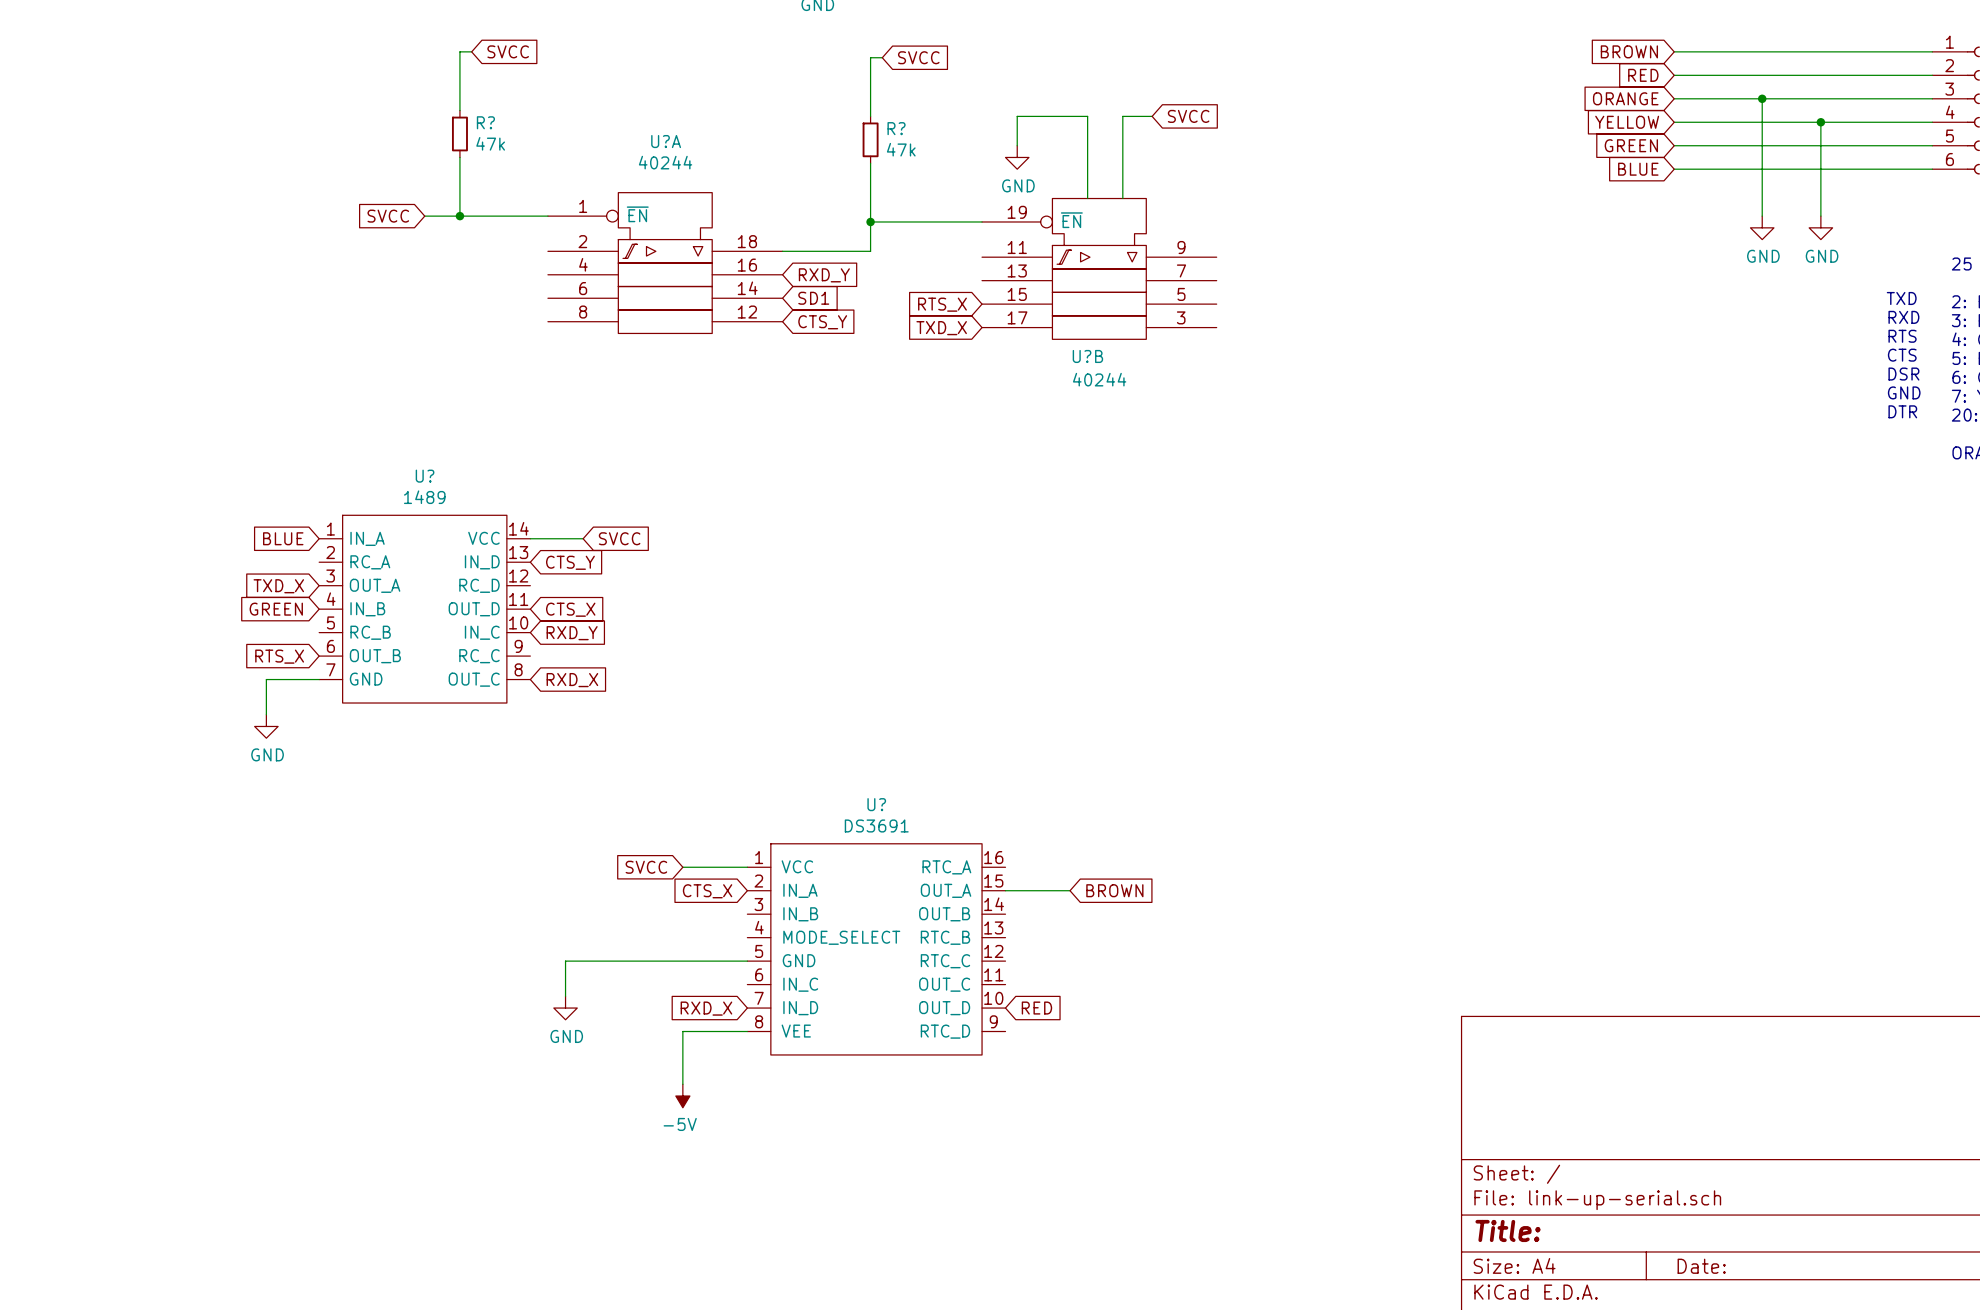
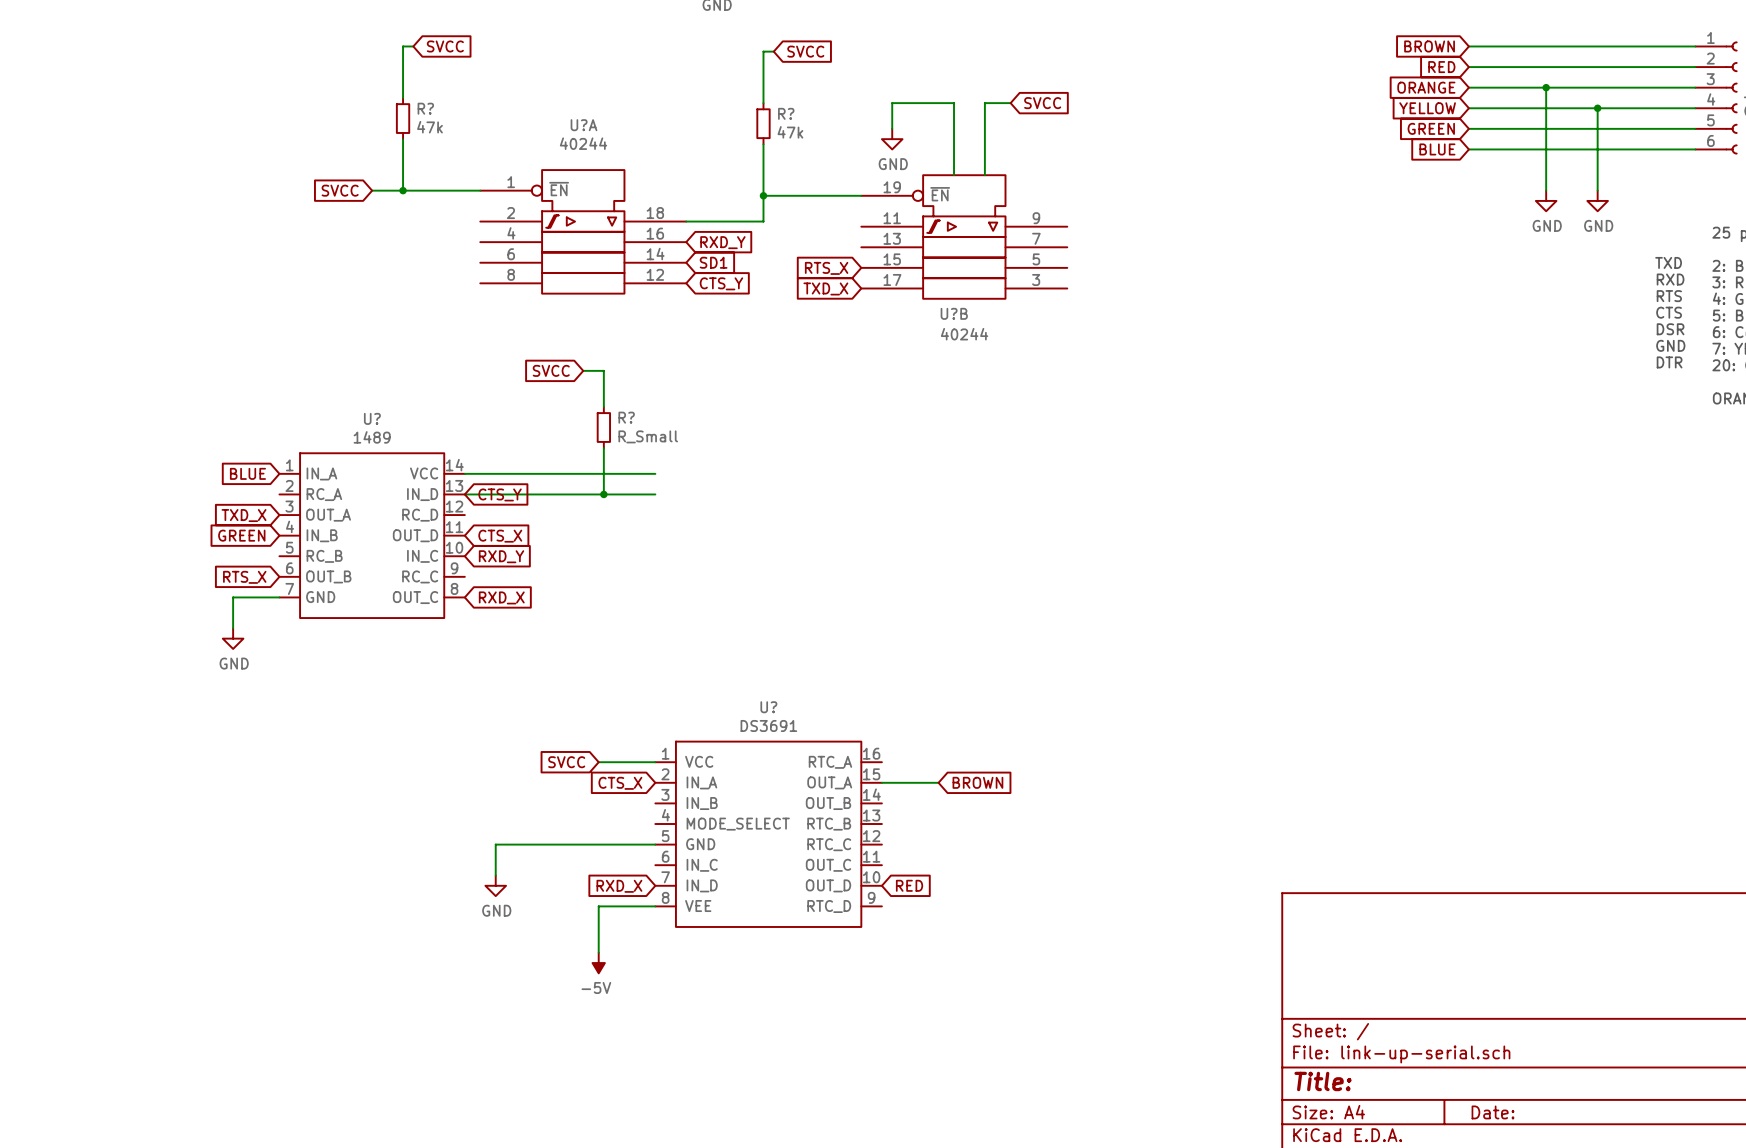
wire: none -> (583, 370) (603, 370) (603, 406)
R?: none -> R_Small (603, 427)
wire: none -> (603, 448) (603, 494)
wire: none -> (511, 473) (655, 473)
global label rotation: 0° (619, 538) -> 180° (551, 370)
global label position: SVCC (619, 538) -> SVCC (551, 370)
wire: none -> (464, 494) (655, 494)
junction: none -> (603, 494)

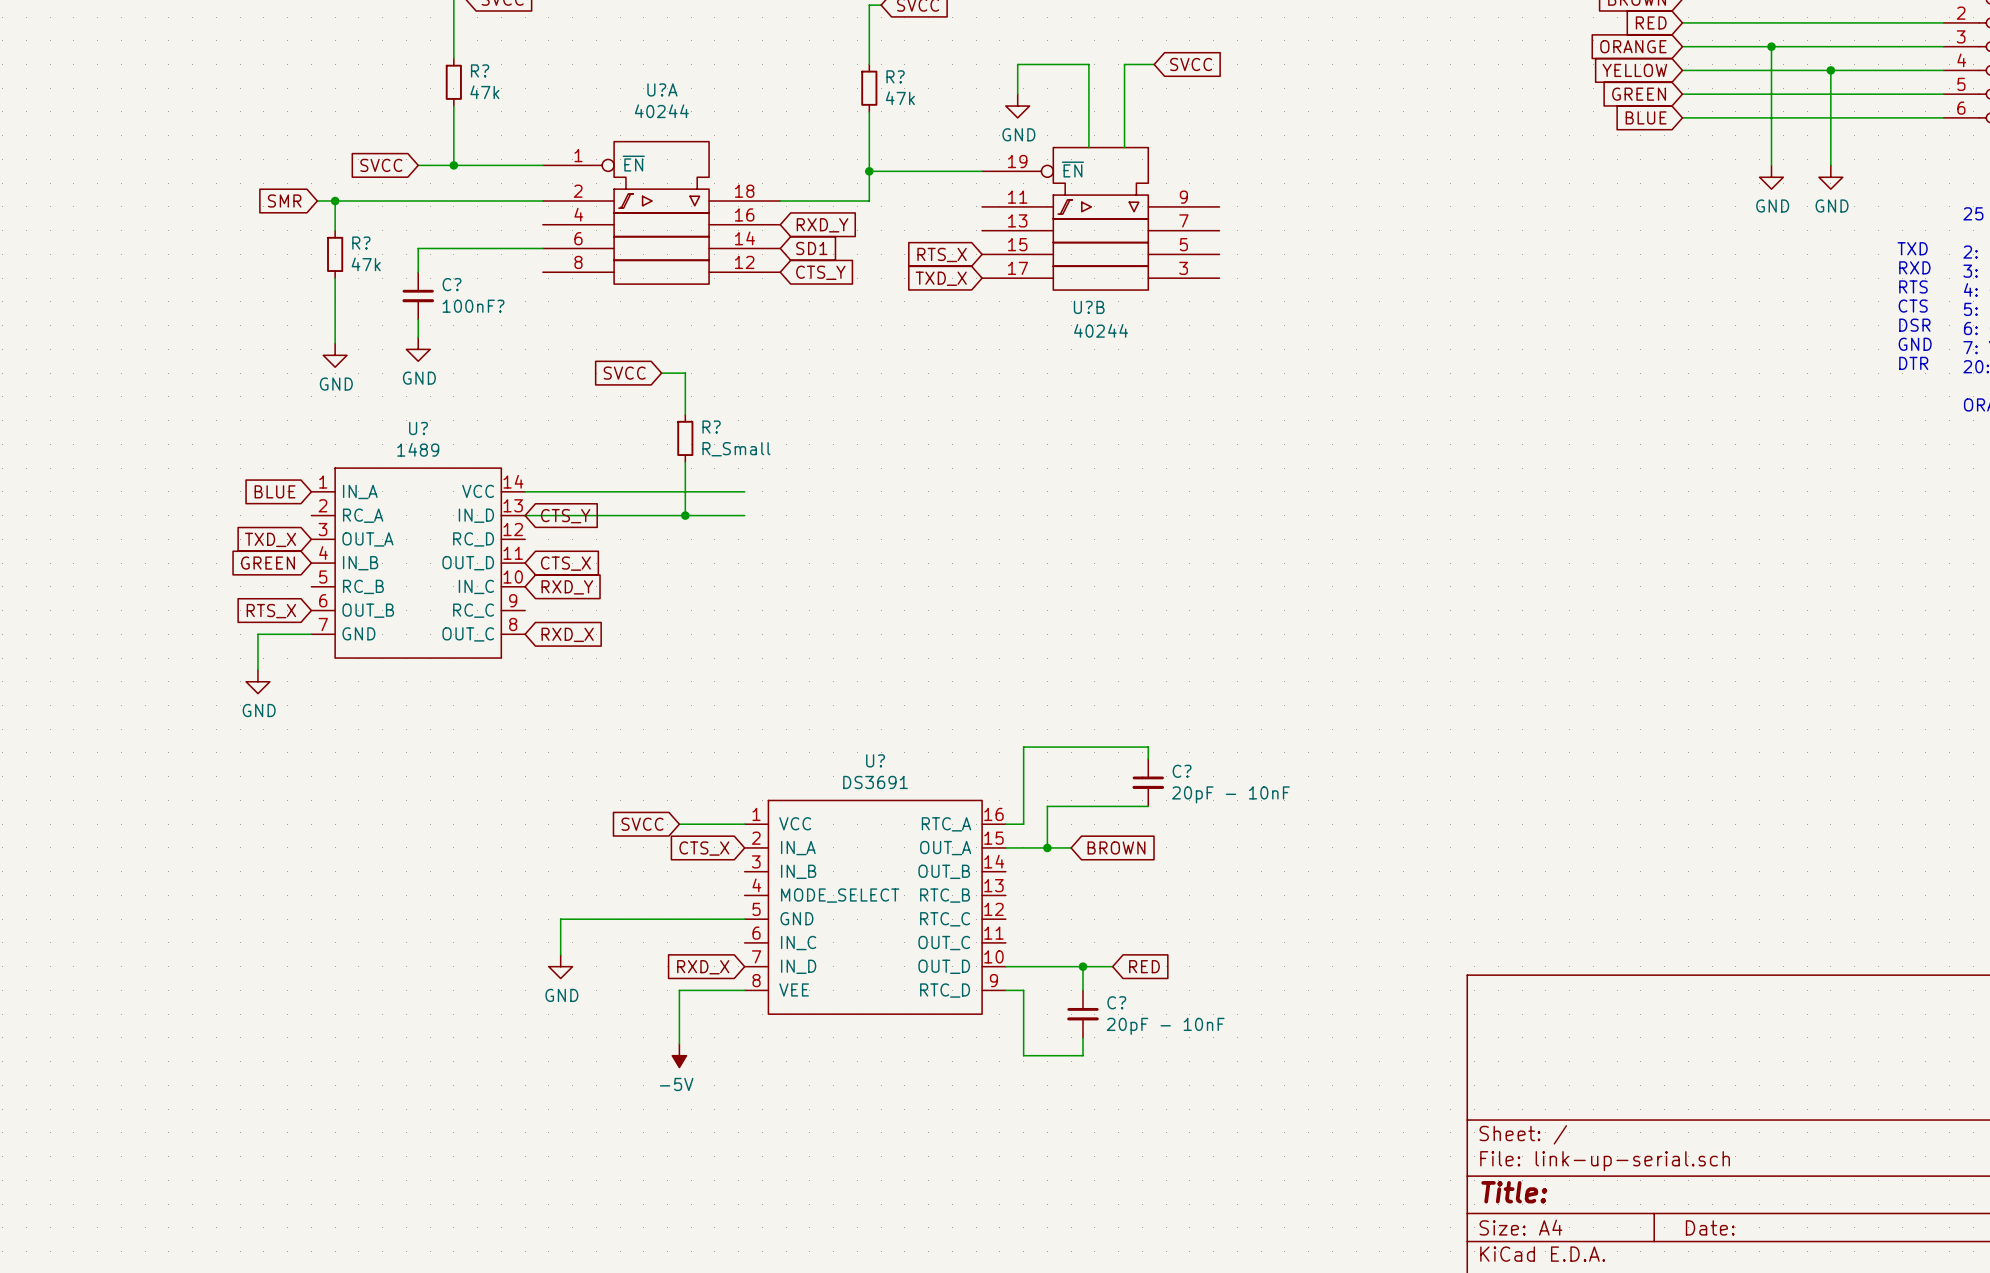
global label: none -> SMR (284, 201)
wire: none -> (317, 201) (542, 201)
wire: none -> (335, 201) (335, 230)
junction: none -> (335, 201)
wire: none -> (542, 248) (418, 248) (418, 272)
R?: none -> 47k (335, 254)
wire: none -> (335, 278) (335, 343)
C?: none -> 100nF? (418, 295)
wire: none -> (418, 319) (418, 337)
power symbol: none -> GND (418, 349)
power symbol: none -> GND (335, 355)
wire: none -> (1148, 758) (1148, 747) (1023, 747) (1023, 824) (1005, 824)
C?: none -> 20pF - 10nF (1148, 782)
wire: none -> (1148, 806) (1047, 806) (1047, 847)
junction: none -> (1047, 847)
wire: none -> (1005, 966) (1112, 966)
global label position: RED (909, 885) -> RED (1144, 966)
wire: none -> (1082, 966) (1082, 990)
junction: none -> (1082, 966)
wire: none -> (1005, 990) (1023, 990) (1023, 1055) (1082, 1055) (1082, 1037)
C?: none -> 20pF - 10nF (1082, 1014)

